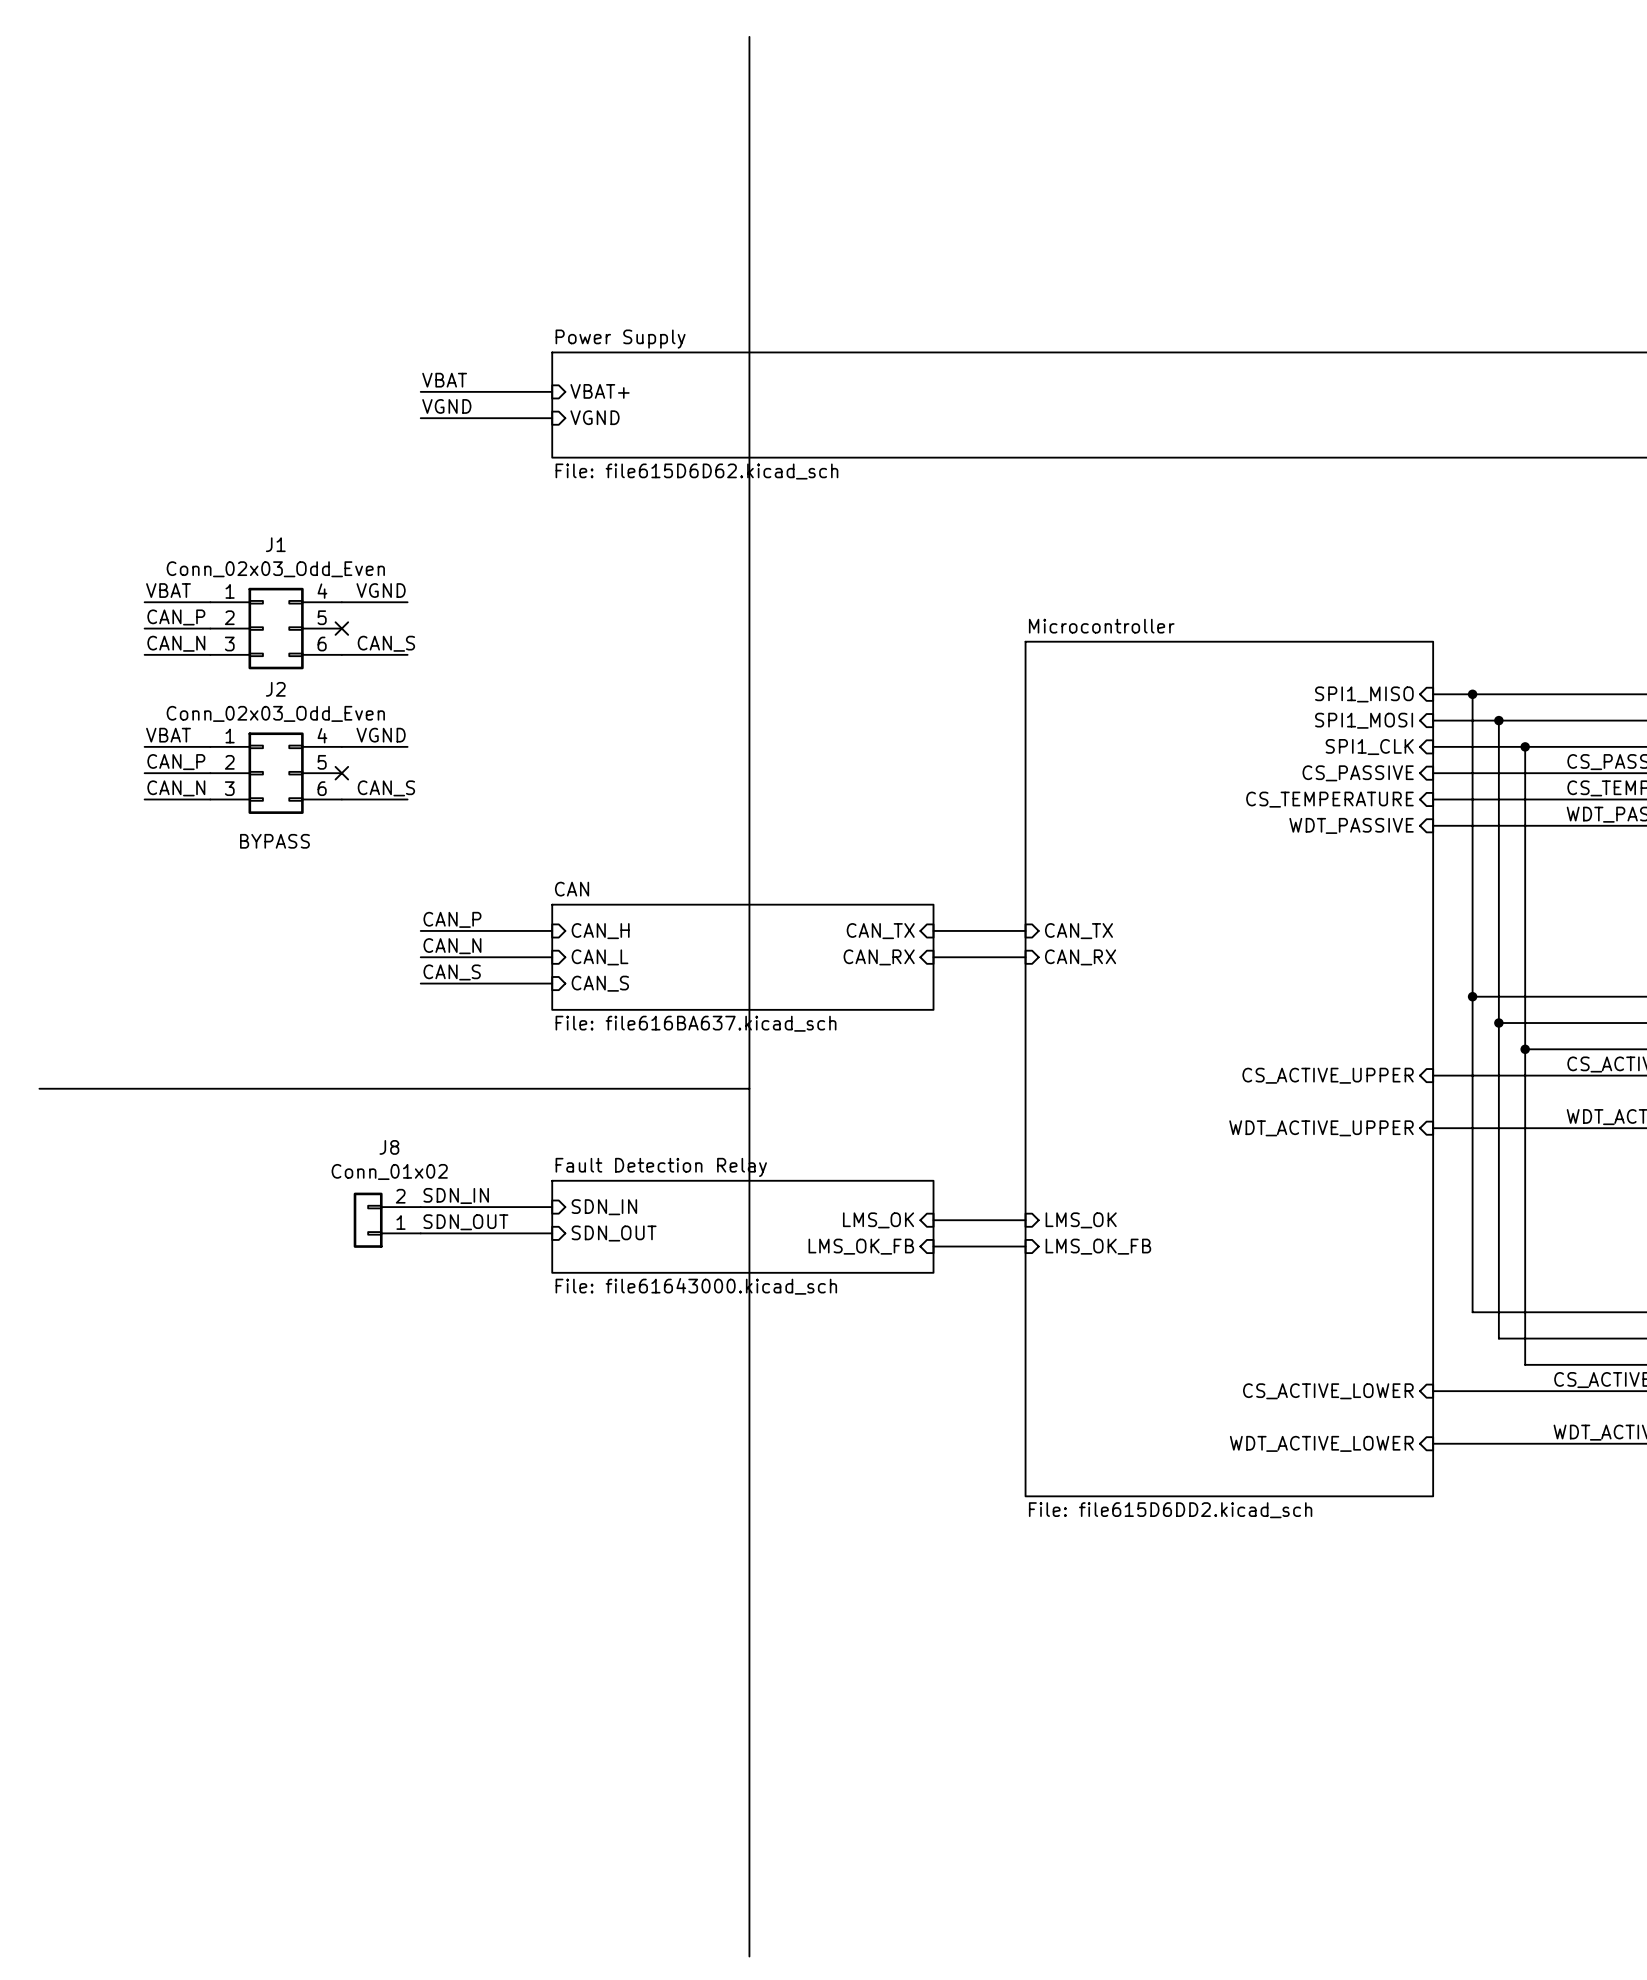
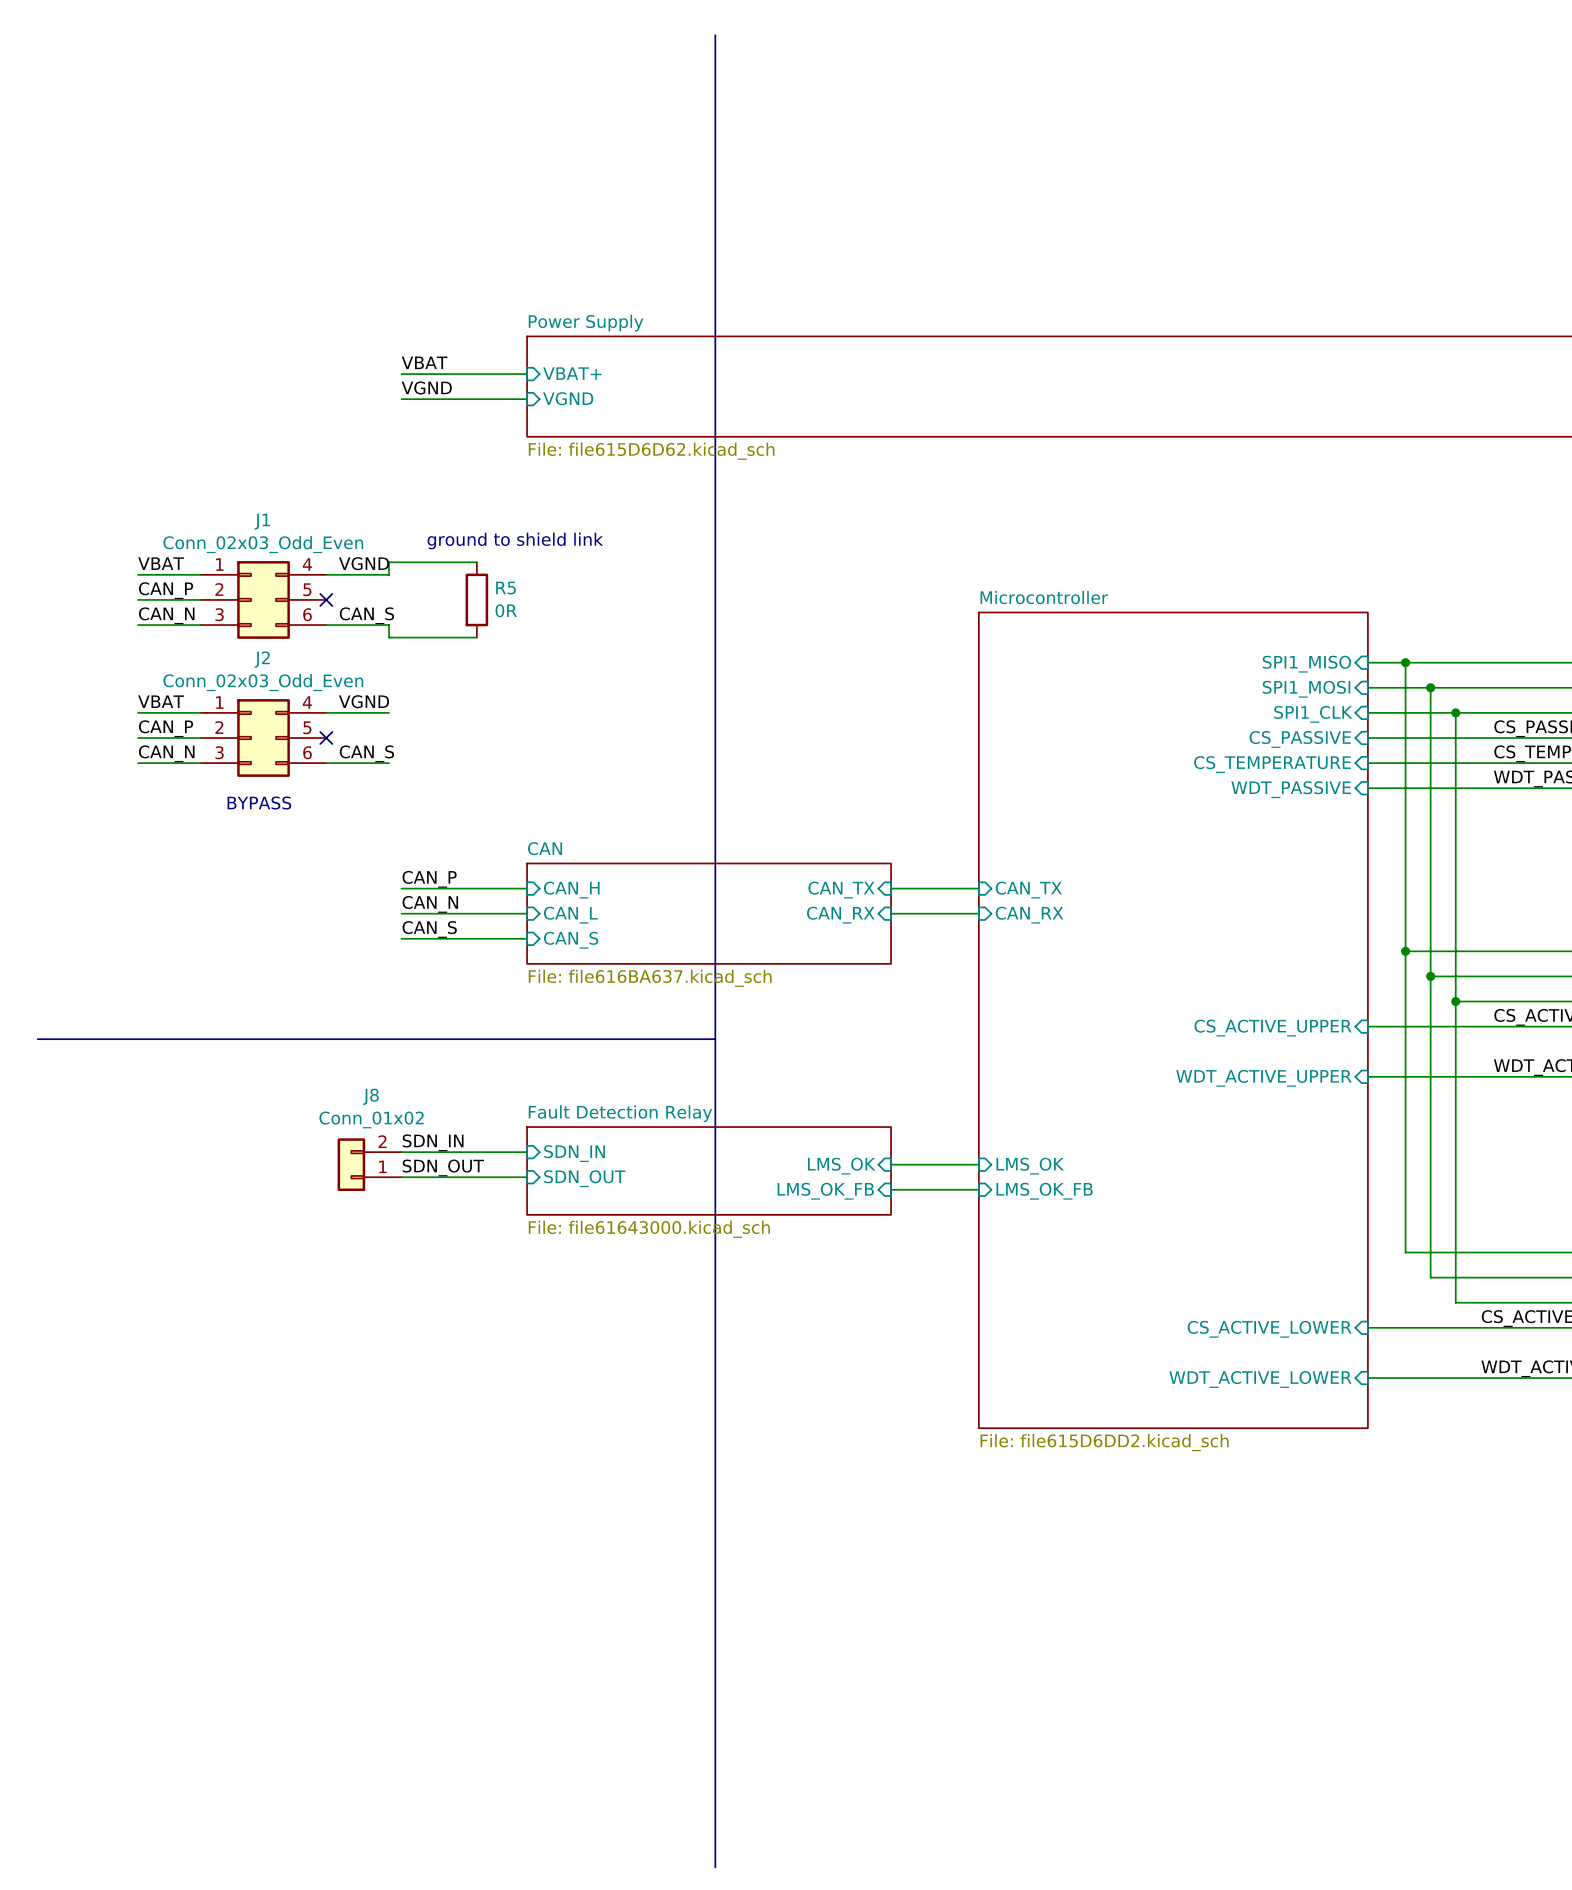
text: none -> ground to shield link (515, 540)
wire: none -> (476, 562) (389, 562) (389, 574)
R5: none -> 0R (476, 599)
wire: none -> (389, 625) (389, 637) (476, 637)

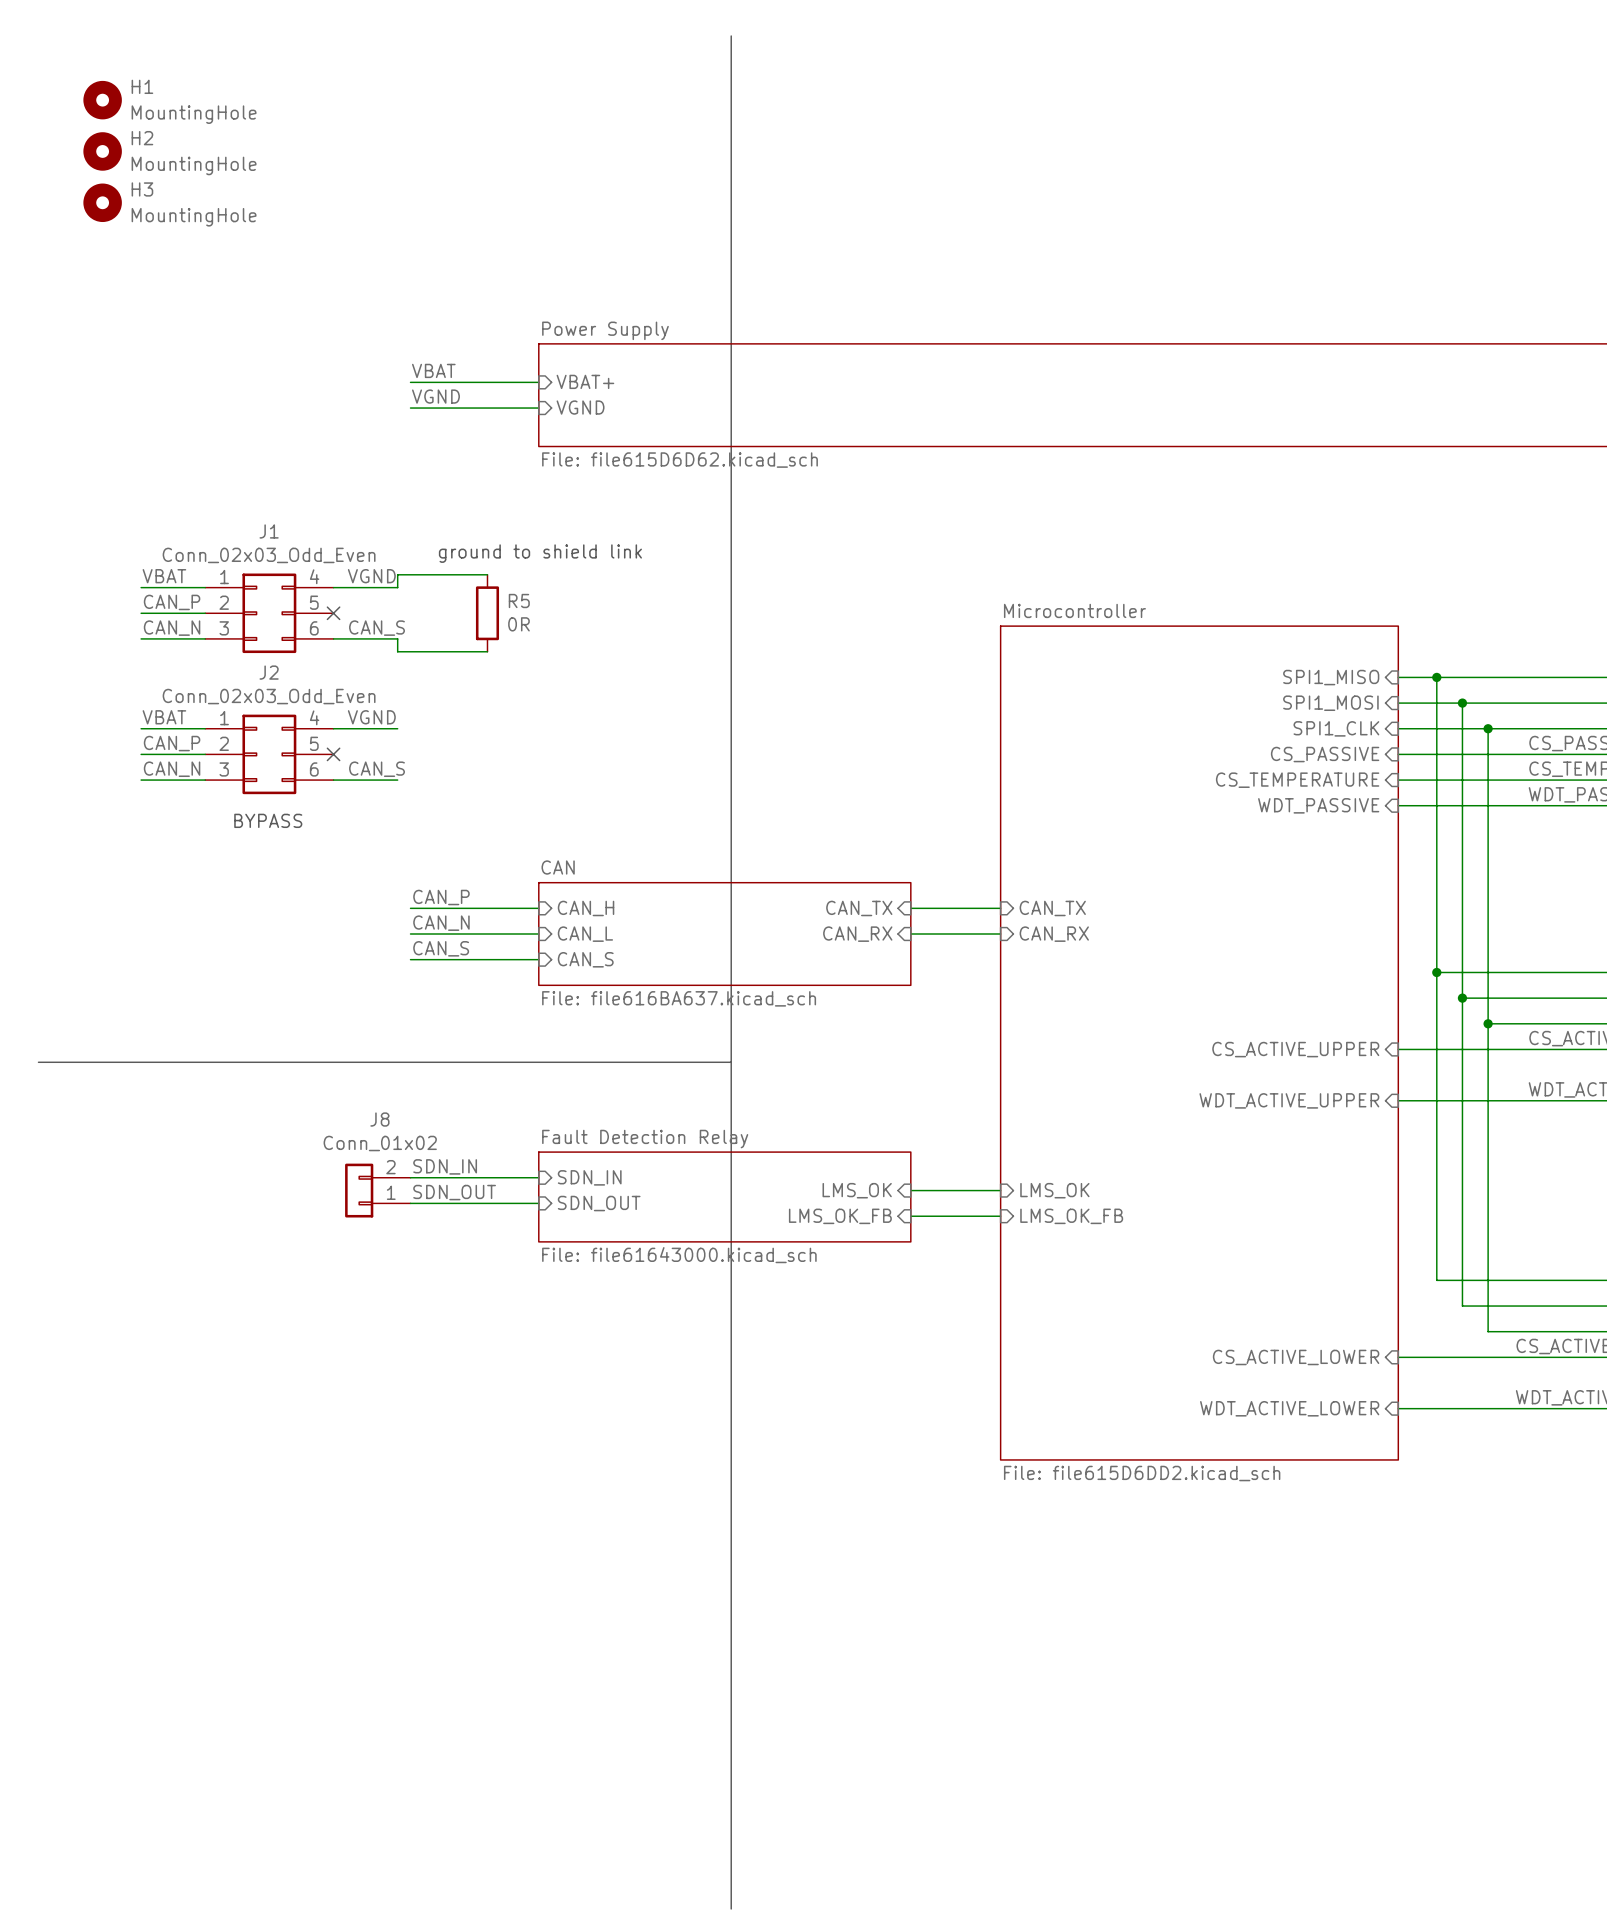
H1: none -> MountingHole (102, 100)
H2: none -> MountingHole (102, 151)
H3: none -> MountingHole (102, 202)

